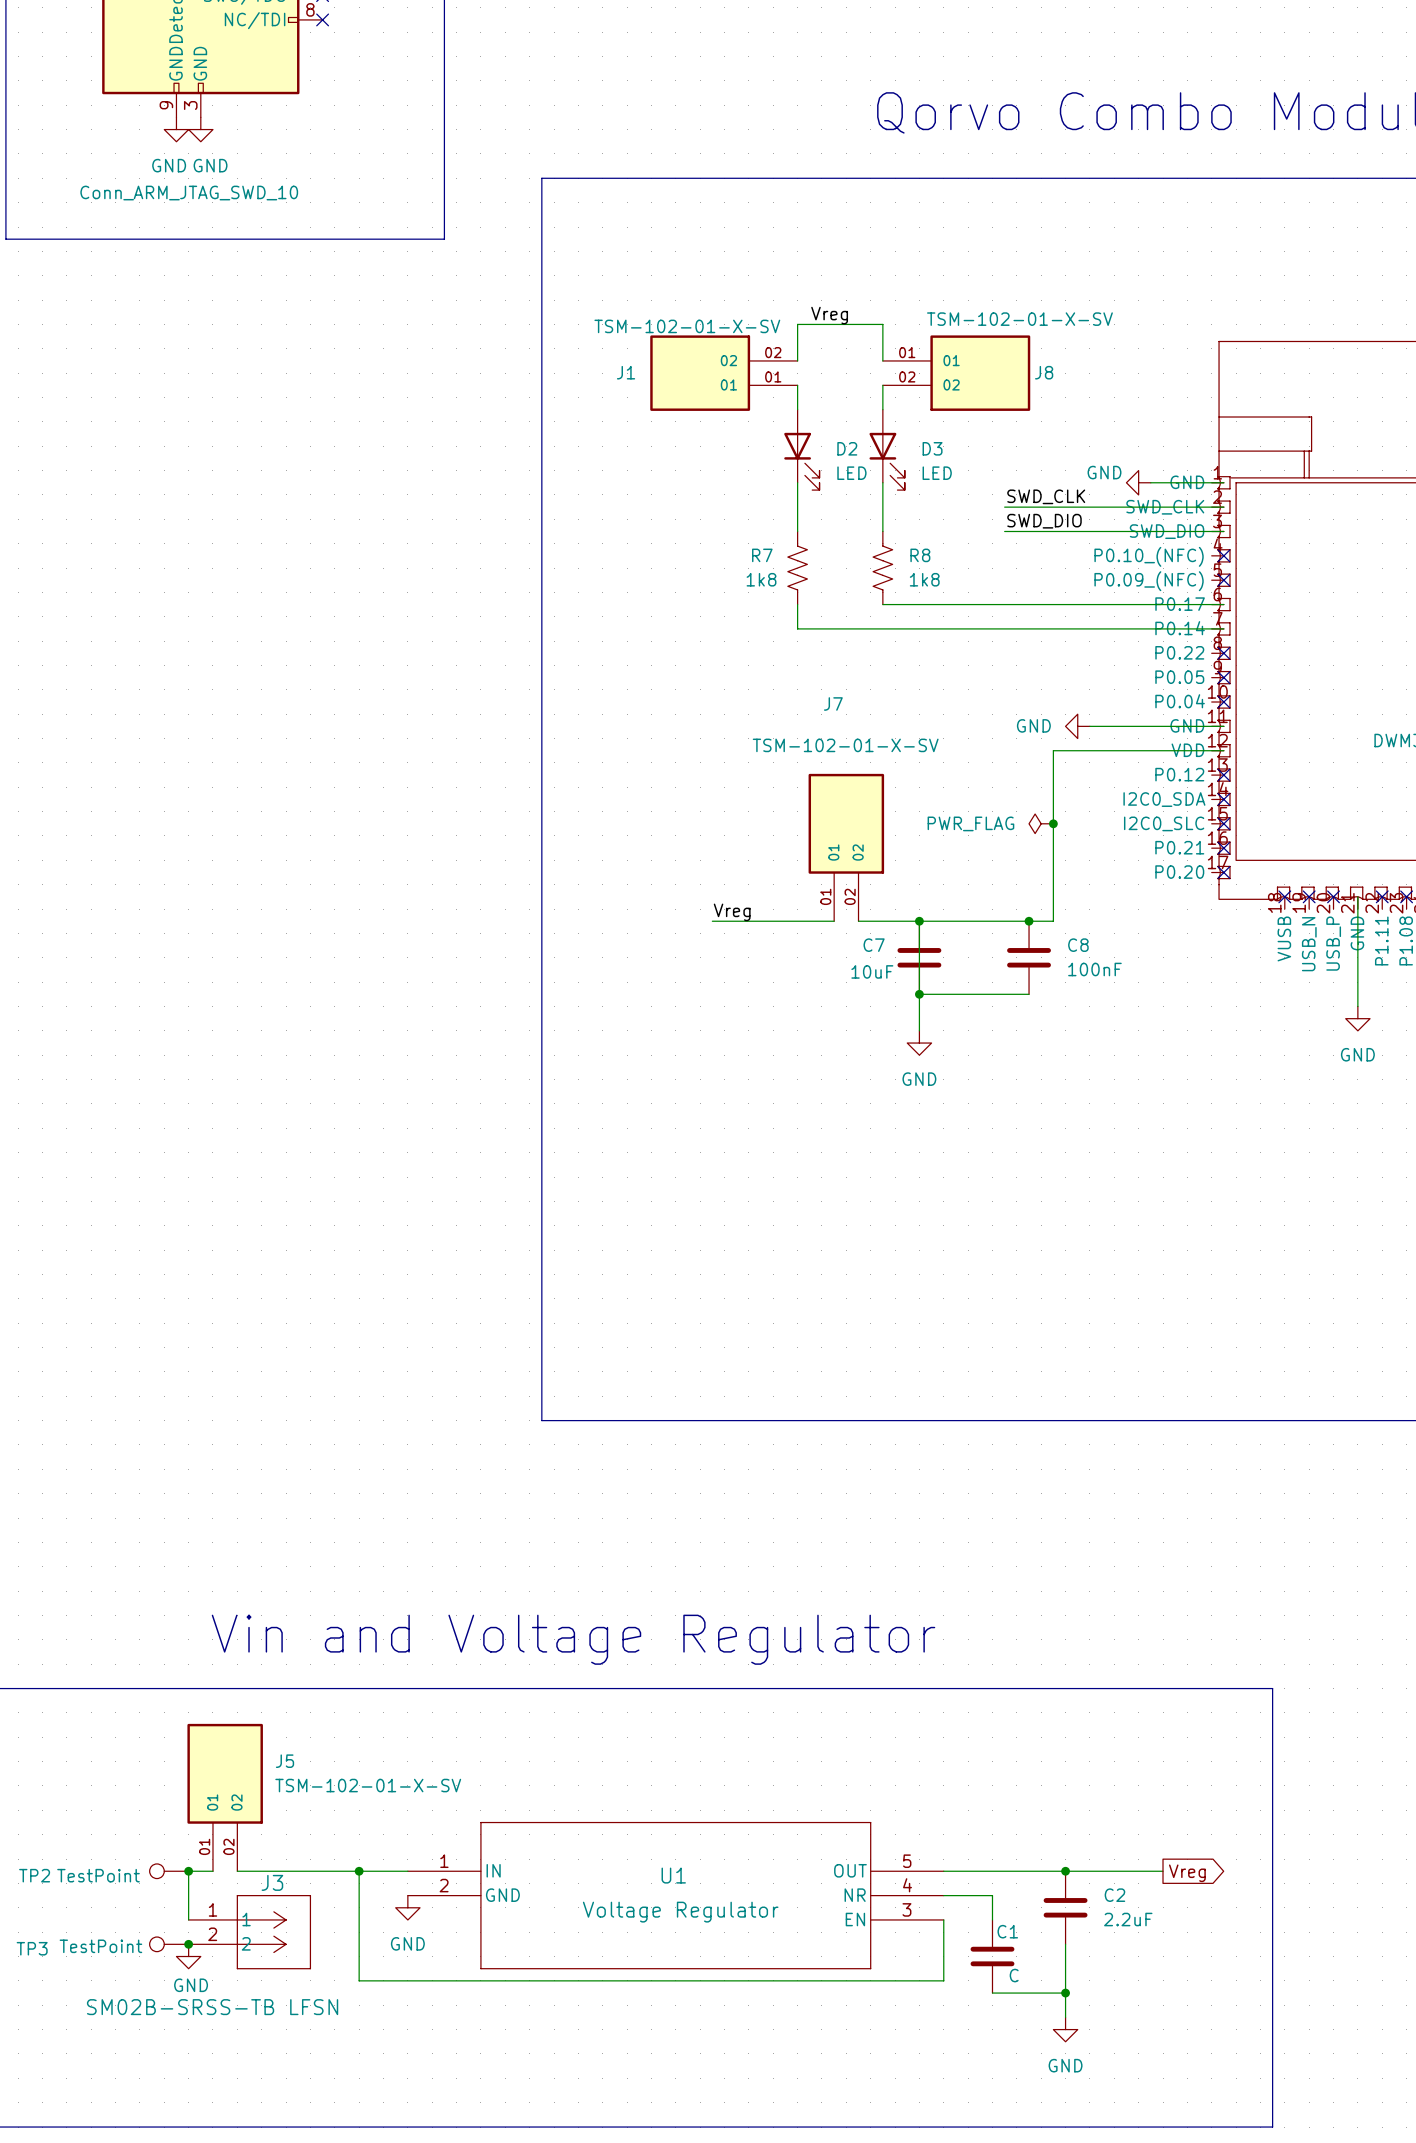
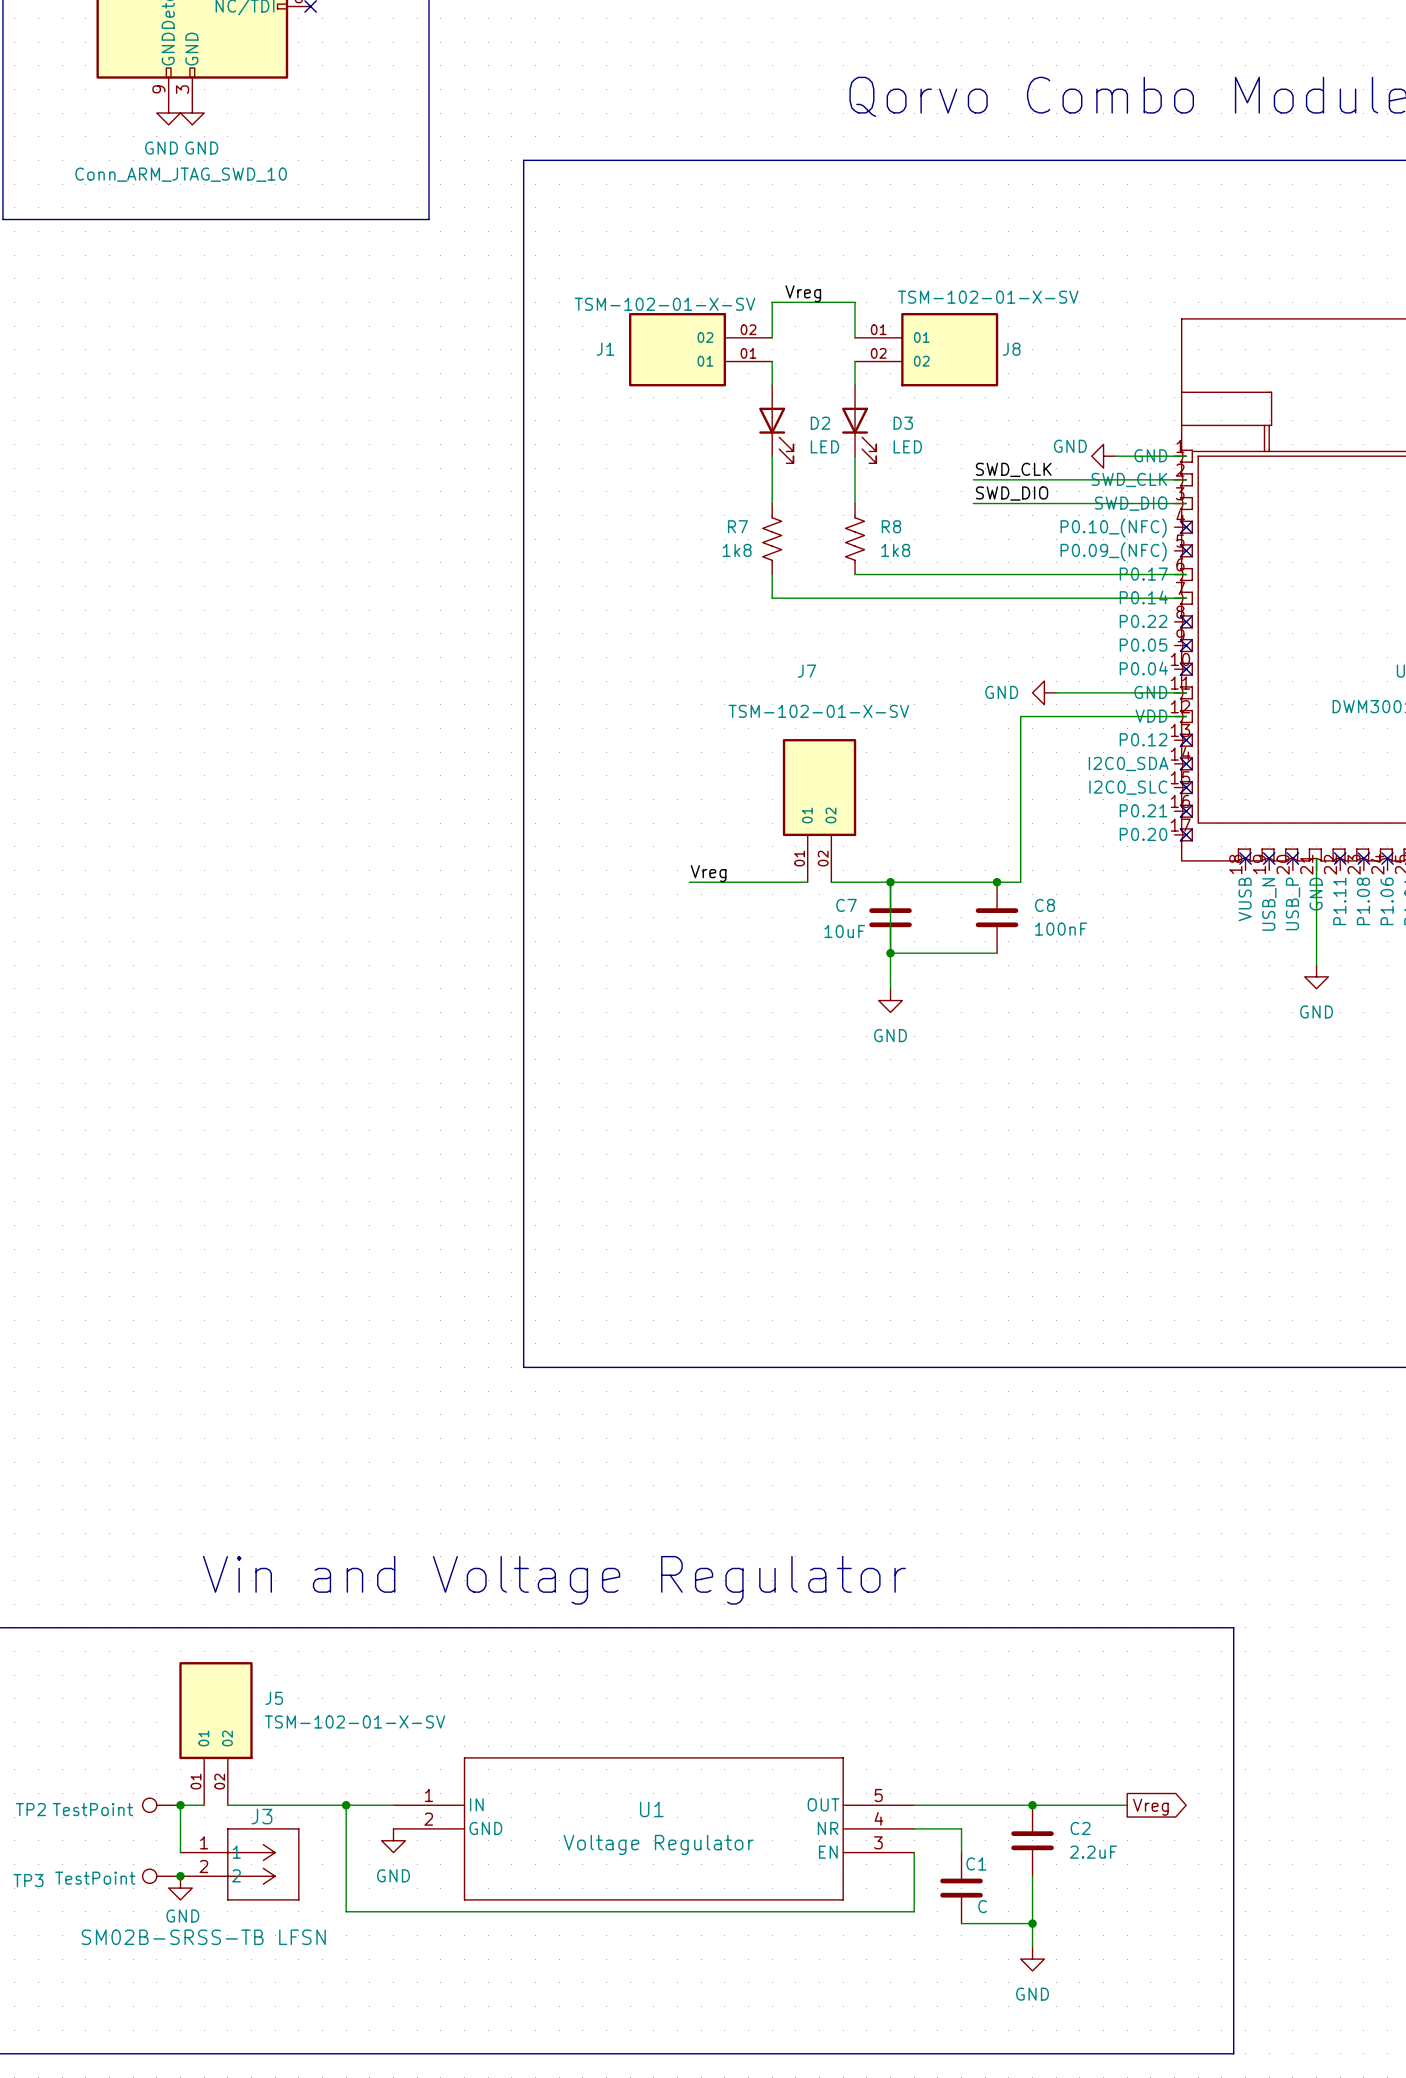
power symbol: PWR_FLAG (1041, 823) -> none
junction: (1053, 823) -> none

